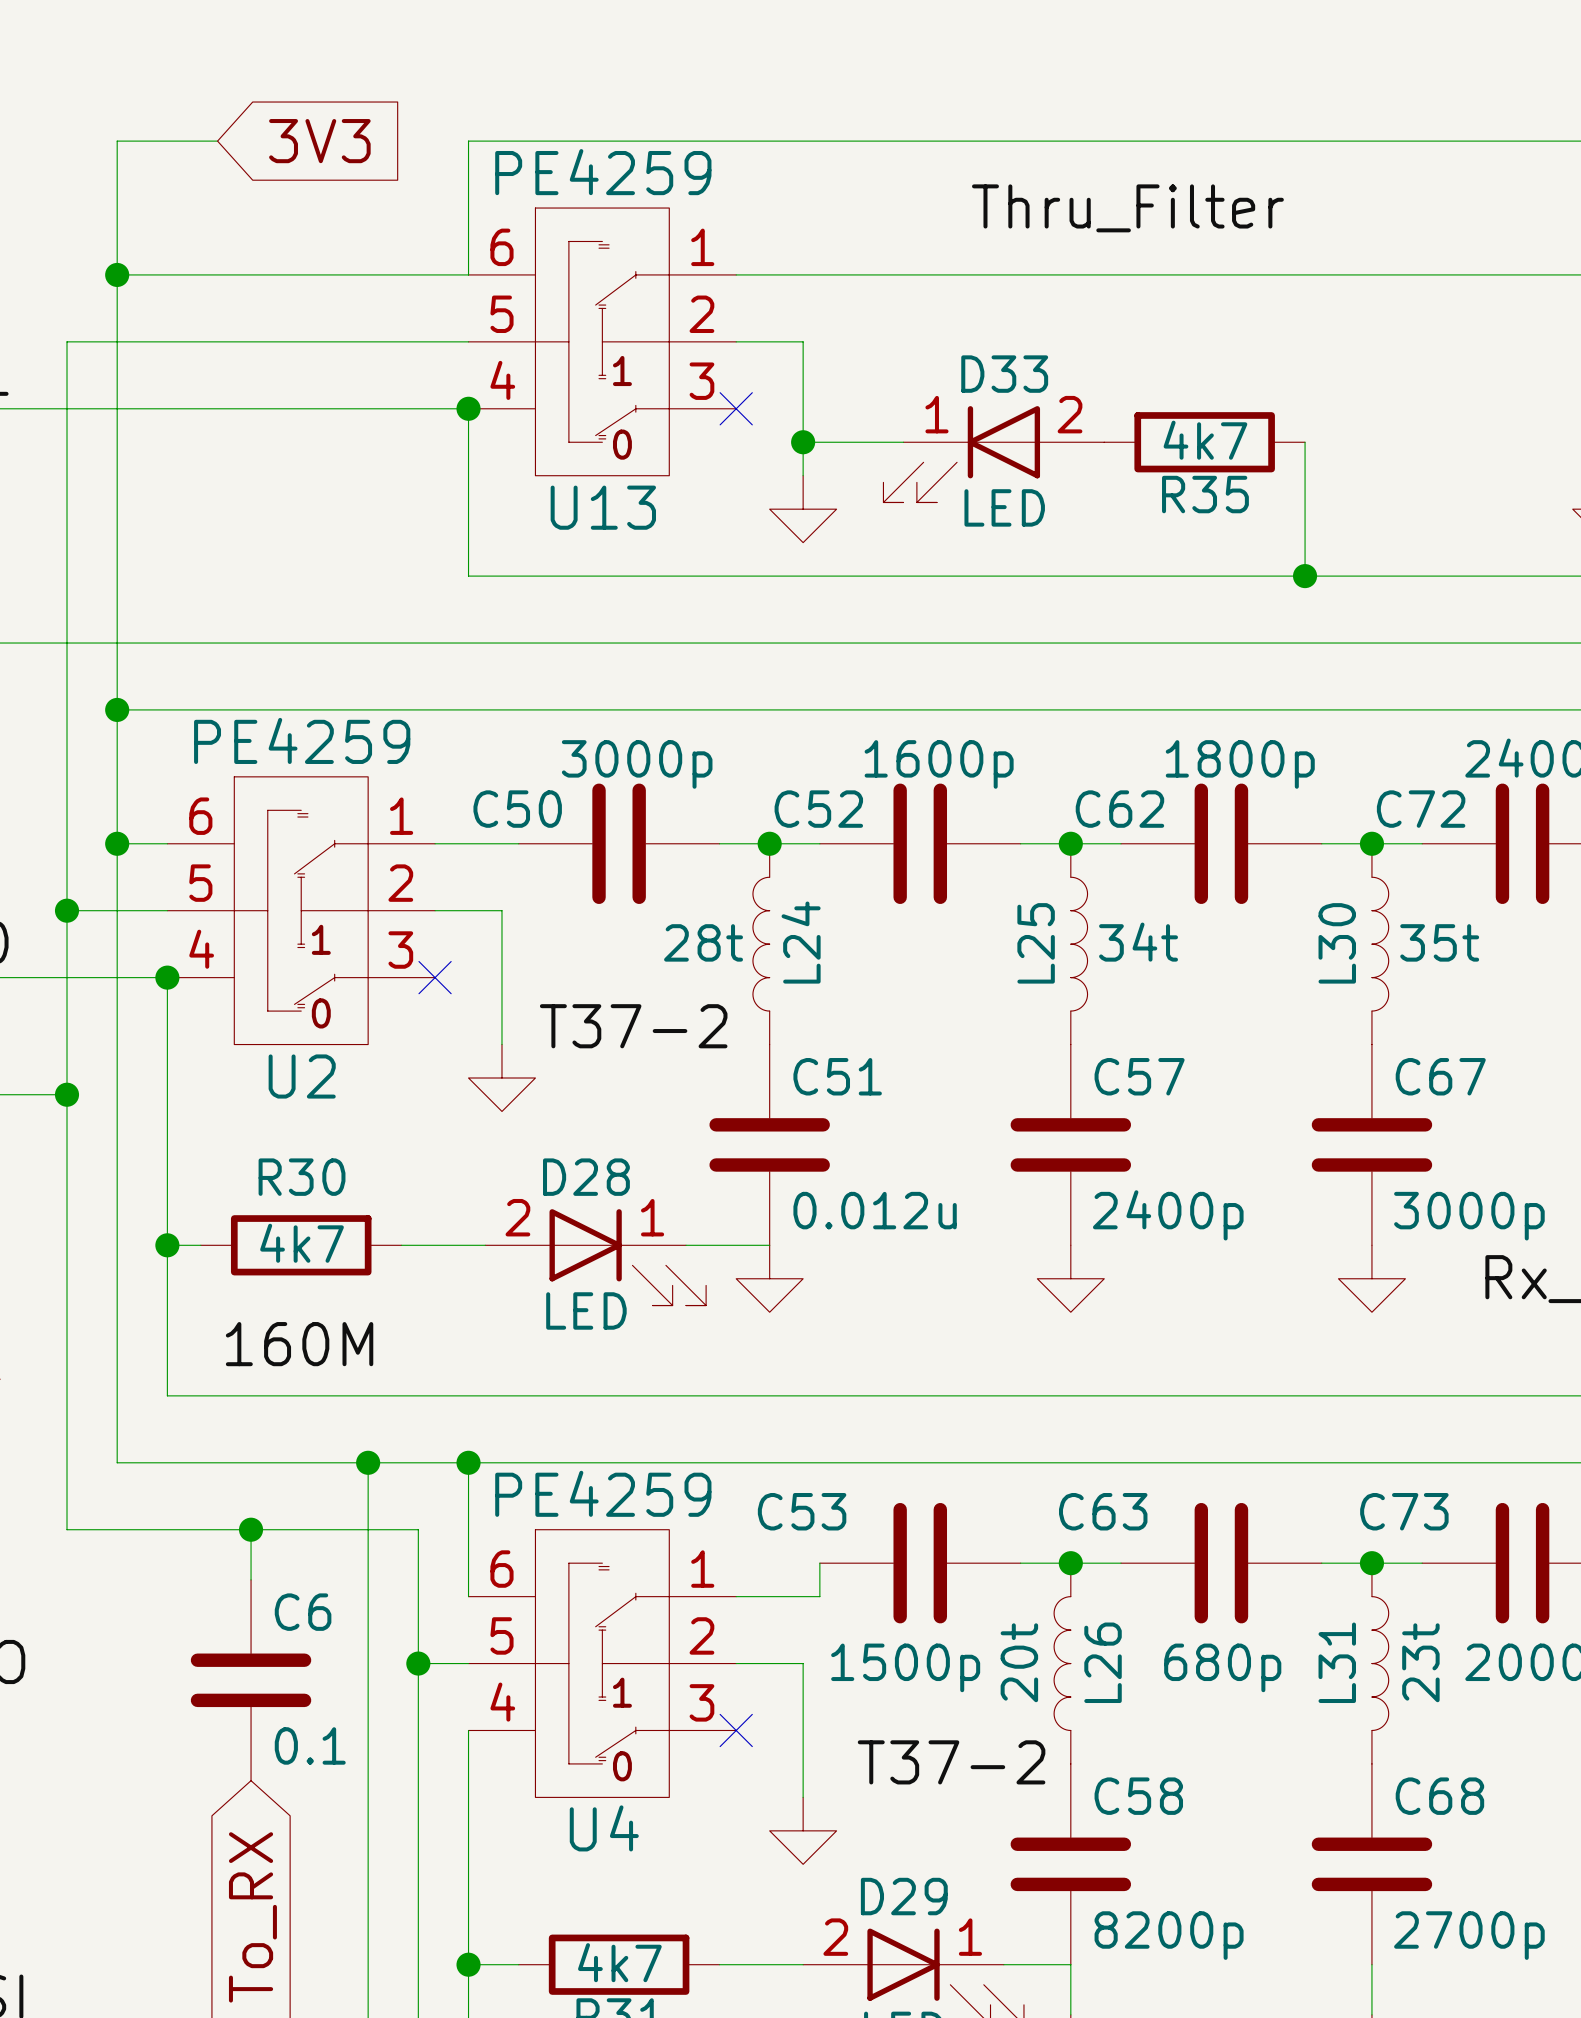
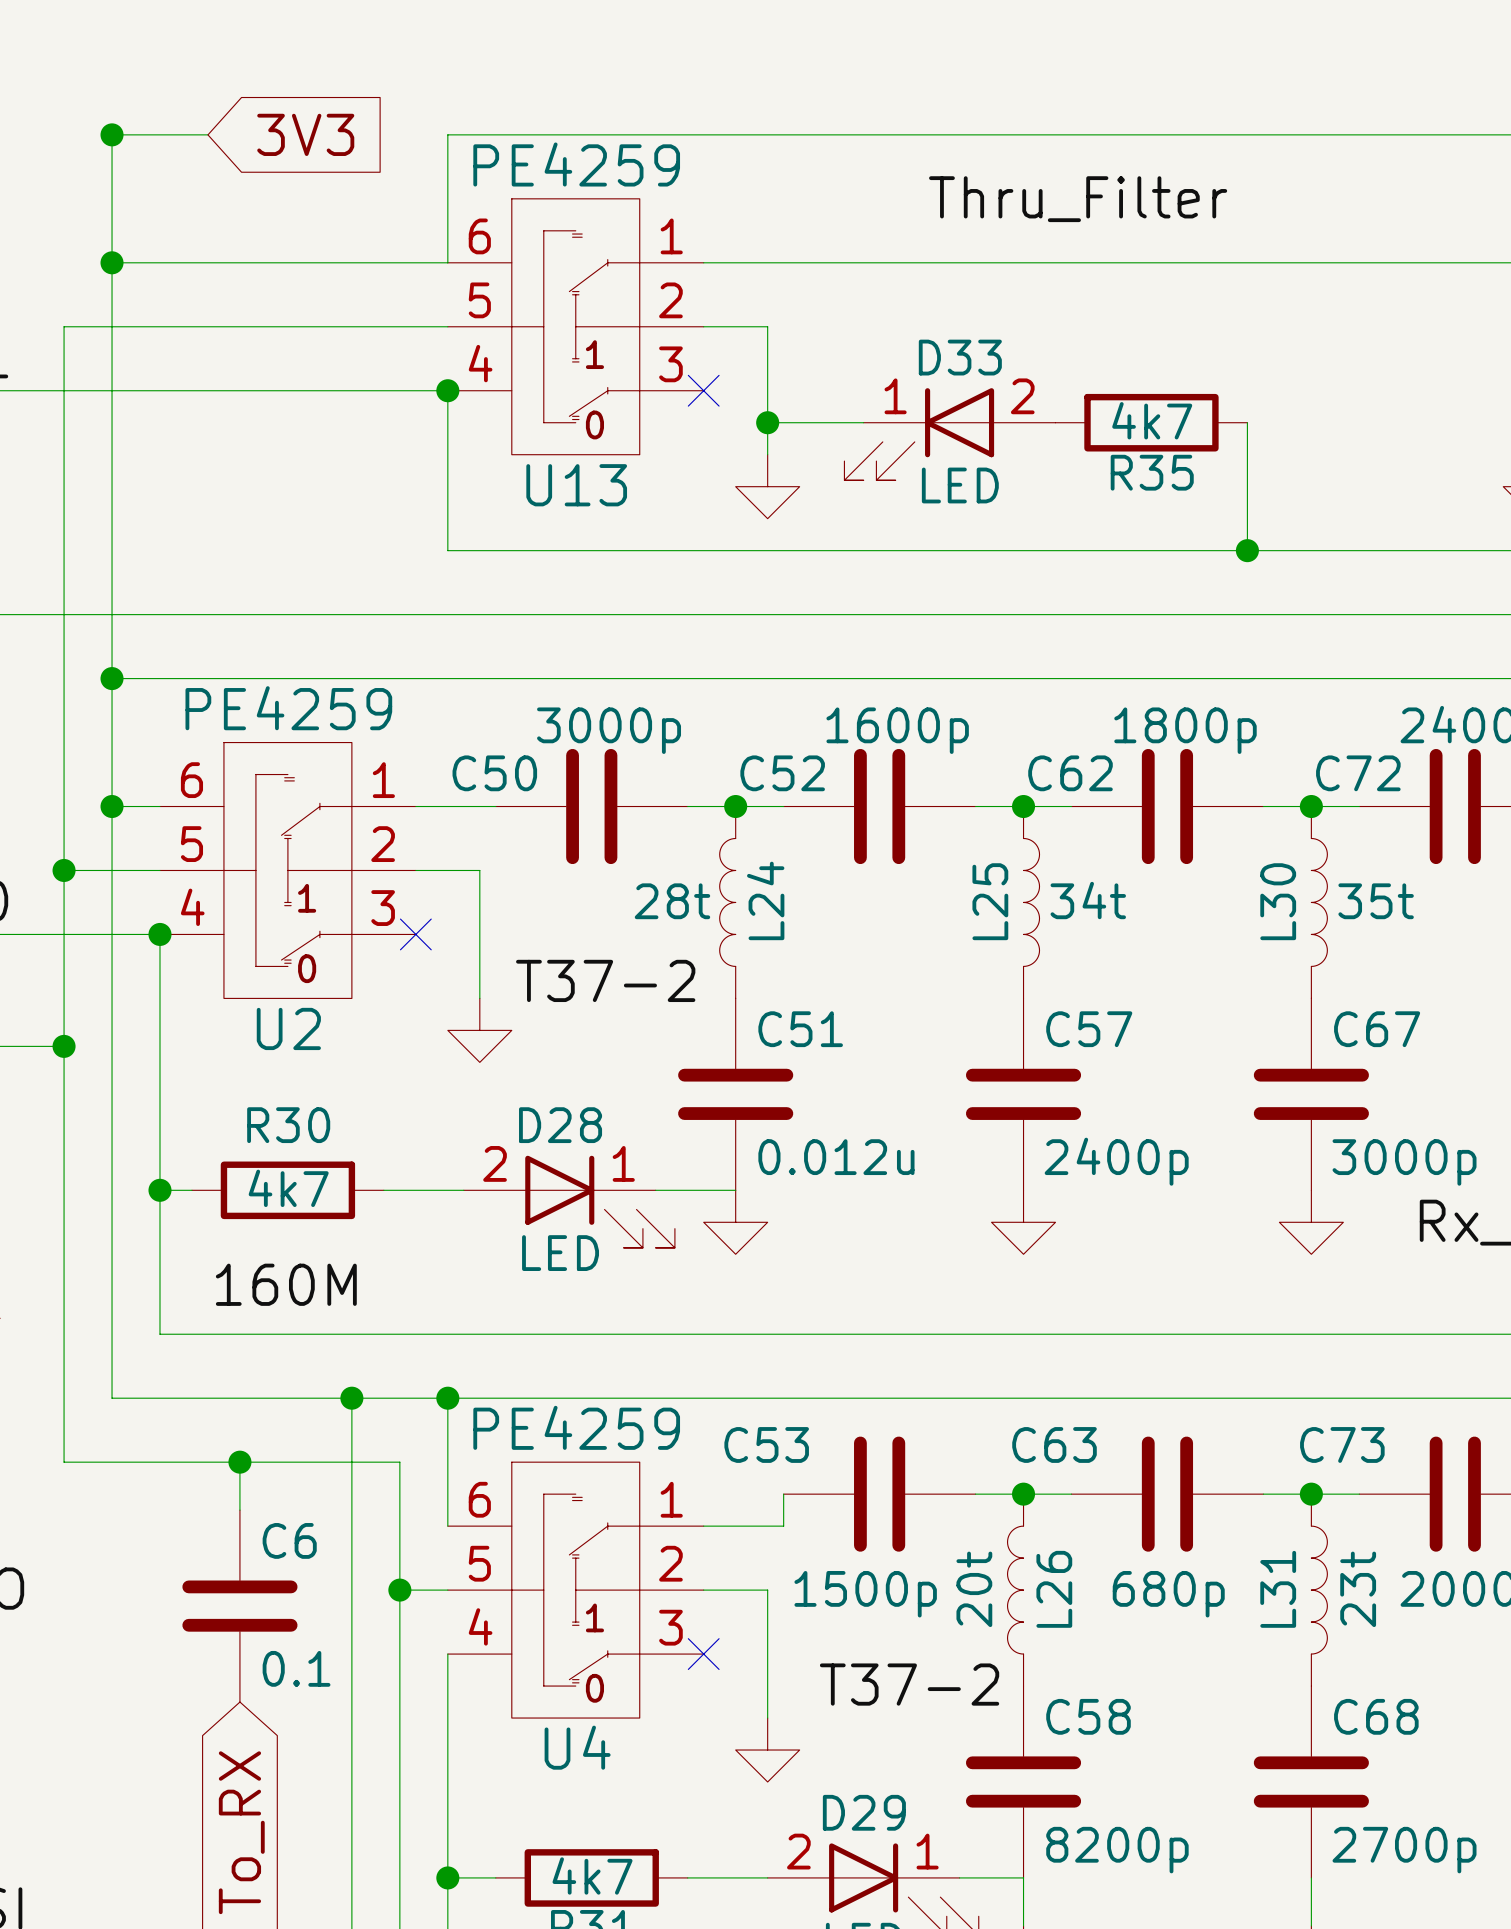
junction: none -> (112, 134)

